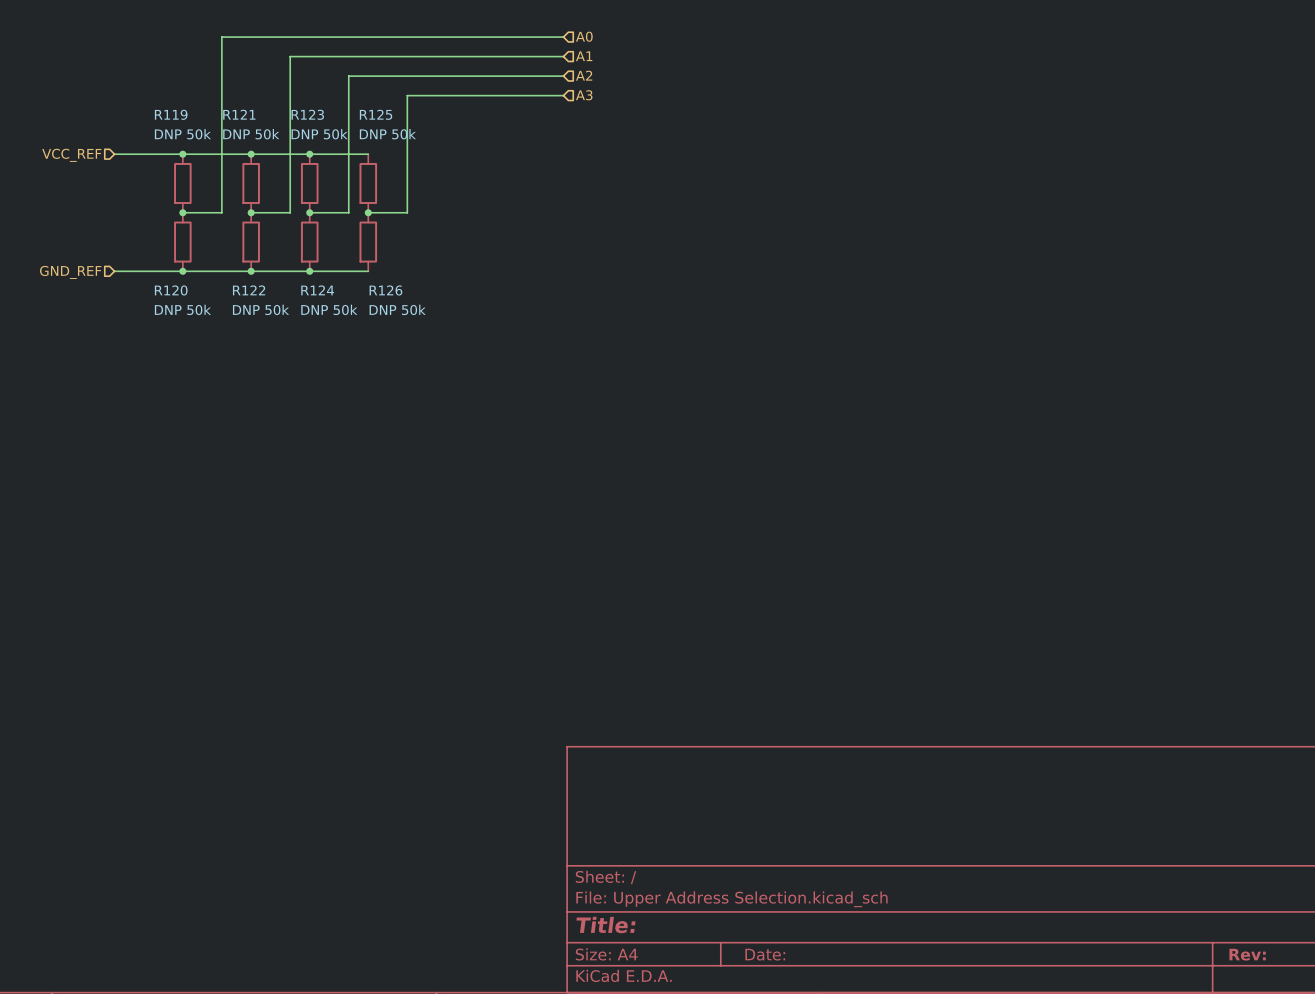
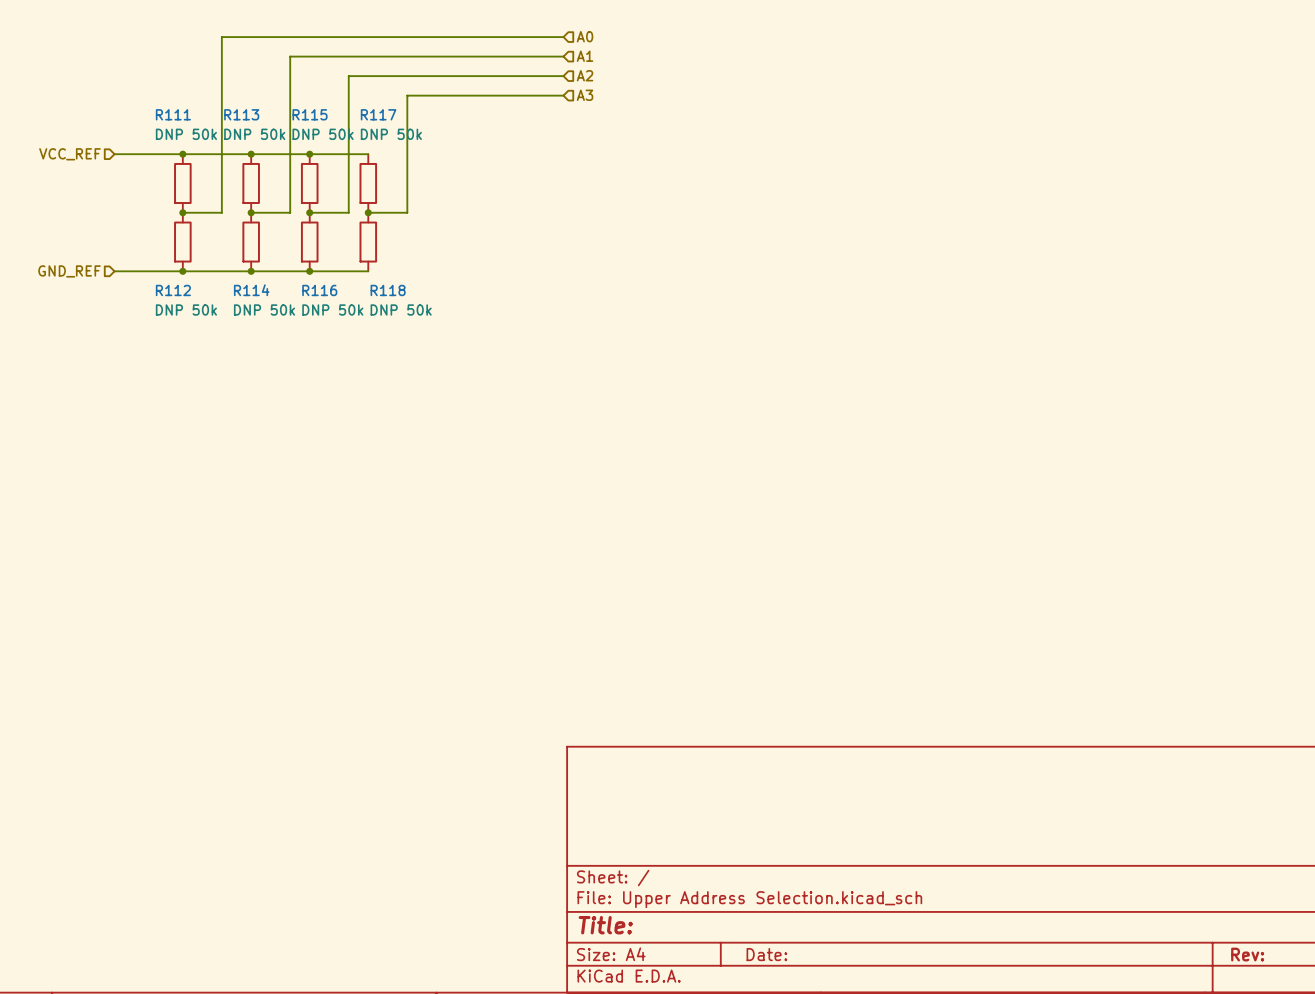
R119 name: R119 (171, 114) -> R111 (173, 114)
R121 name: R121 (239, 114) -> R113 (241, 114)
R123 name: R123 (307, 114) -> R115 (310, 114)
R125 name: R125 (376, 114) -> R117 (378, 114)
R120 name: R120 (171, 290) -> R112 (173, 290)
R122 name: R122 (249, 290) -> R114 (251, 290)
R124 name: R124 (317, 290) -> R116 (319, 290)
R126 name: R126 (385, 290) -> R118 (388, 290)

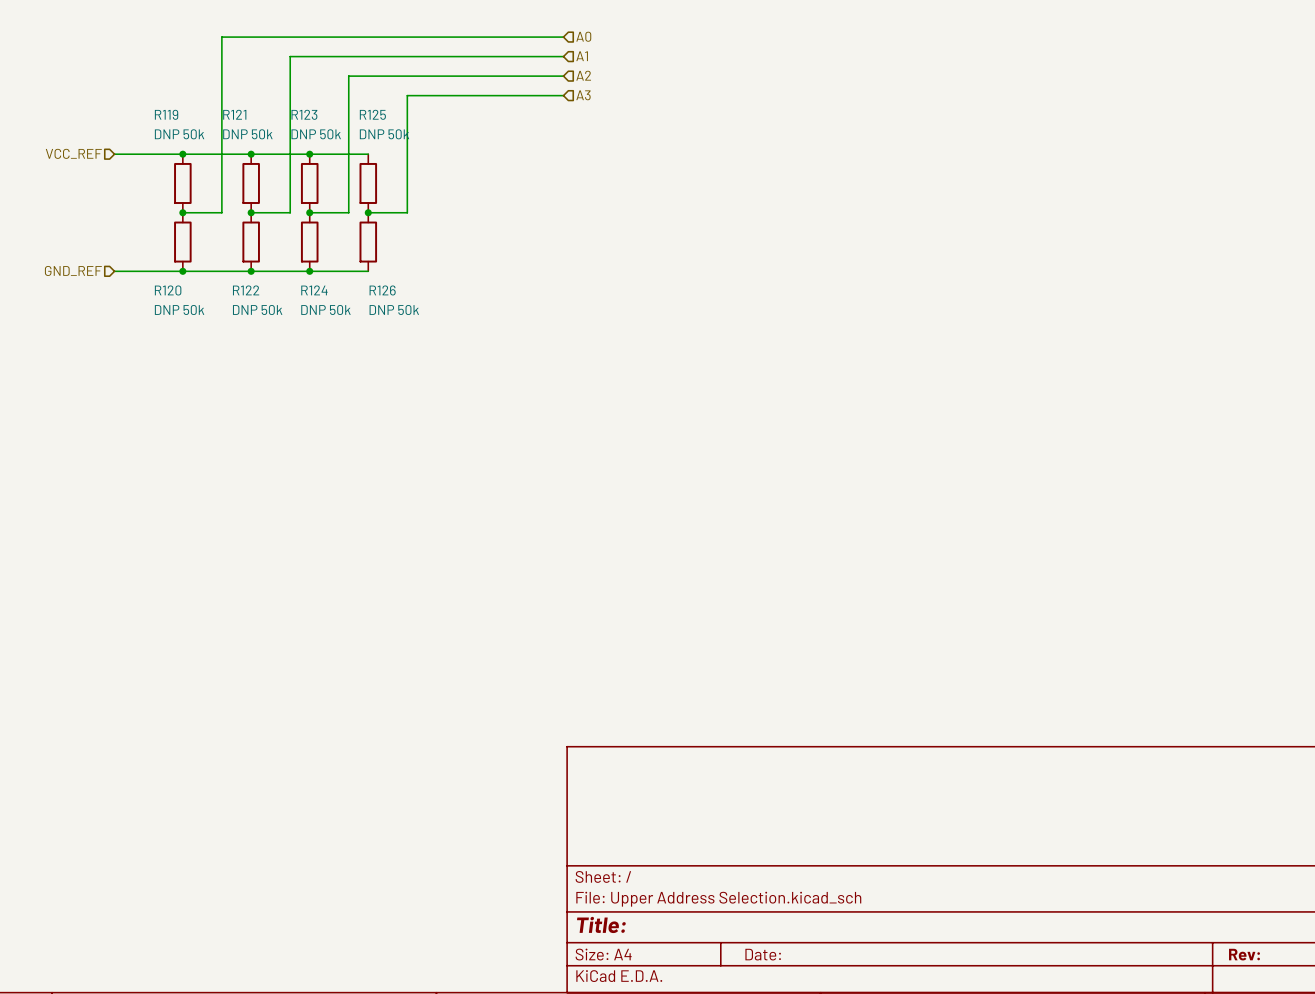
R111 name: R111 (173, 114) -> R119 (166, 114)
R113 name: R113 (241, 114) -> R121 (234, 114)
R115 name: R115 (310, 114) -> R123 (304, 114)
R117 name: R117 (378, 114) -> R125 (372, 114)
R112 name: R112 (173, 290) -> R120 (168, 290)
R114 name: R114 (251, 290) -> R122 (246, 290)
R116 name: R116 (319, 290) -> R124 (314, 290)
R118 name: R118 (388, 290) -> R126 (382, 290)

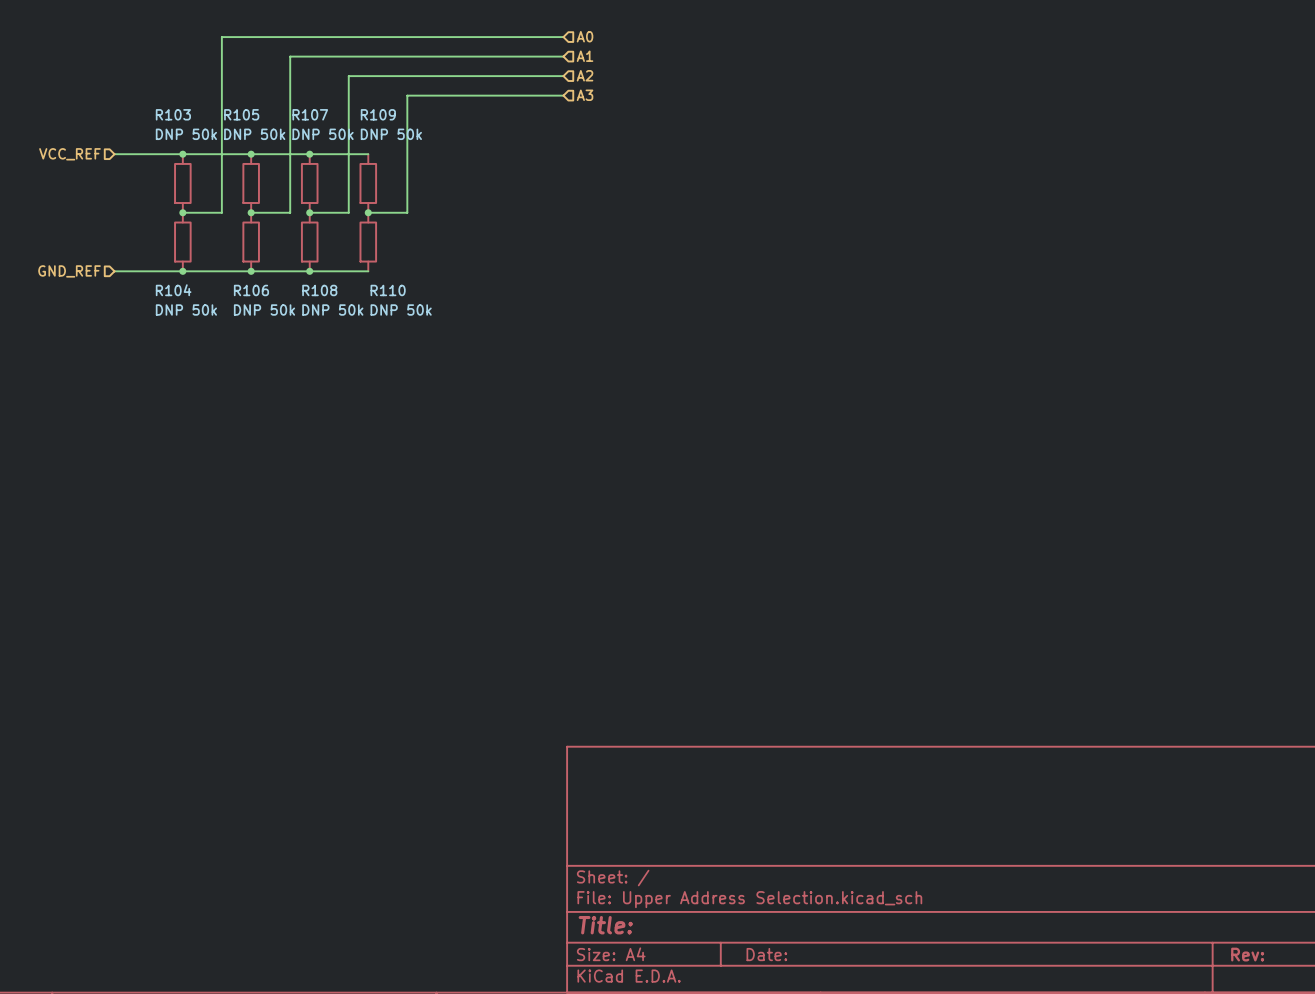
R119 name: R119 (166, 114) -> R103 (173, 114)
R121 name: R121 (234, 114) -> R105 (241, 114)
R123 name: R123 (304, 114) -> R107 (310, 114)
R125 name: R125 (372, 114) -> R109 (378, 114)
R120 name: R120 (168, 290) -> R104 (173, 290)
R122 name: R122 (246, 290) -> R106 (251, 290)
R124 name: R124 (314, 290) -> R108 (319, 290)
R126 name: R126 (382, 290) -> R110 (388, 290)

